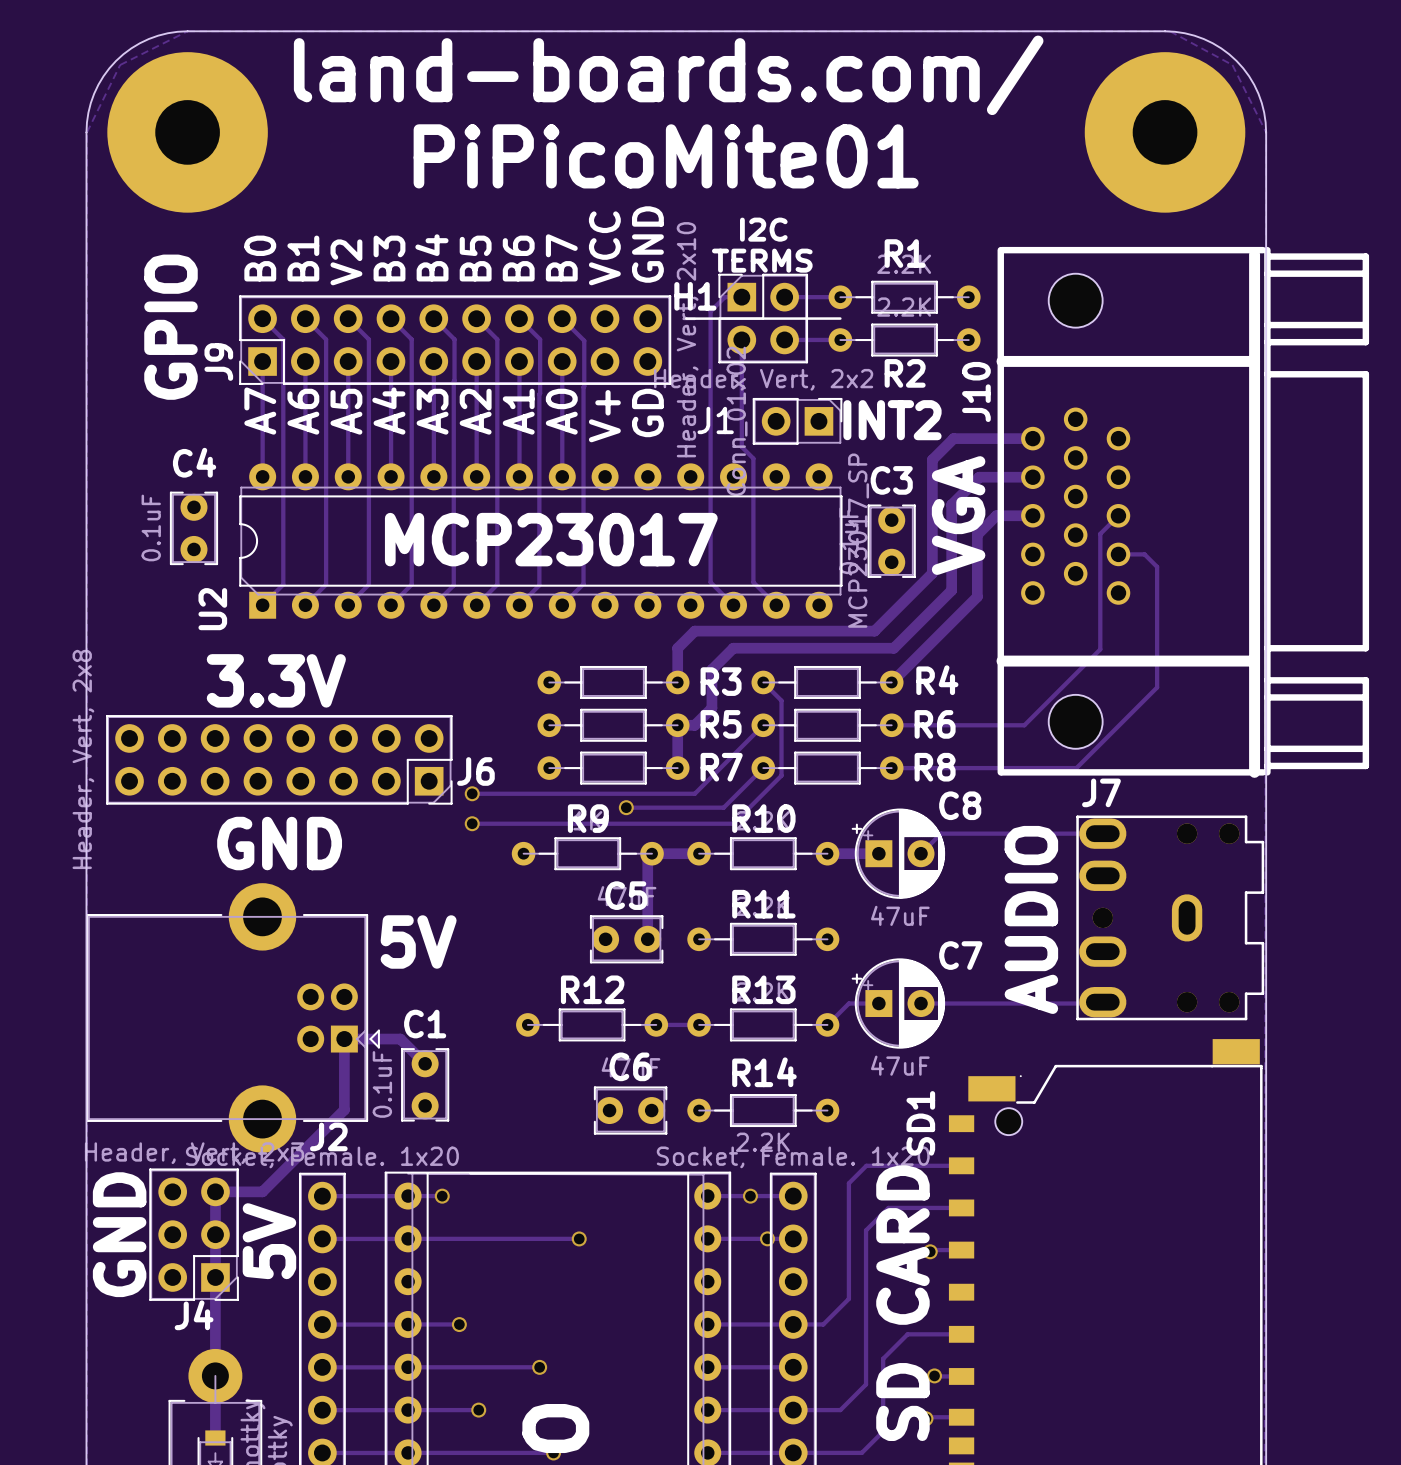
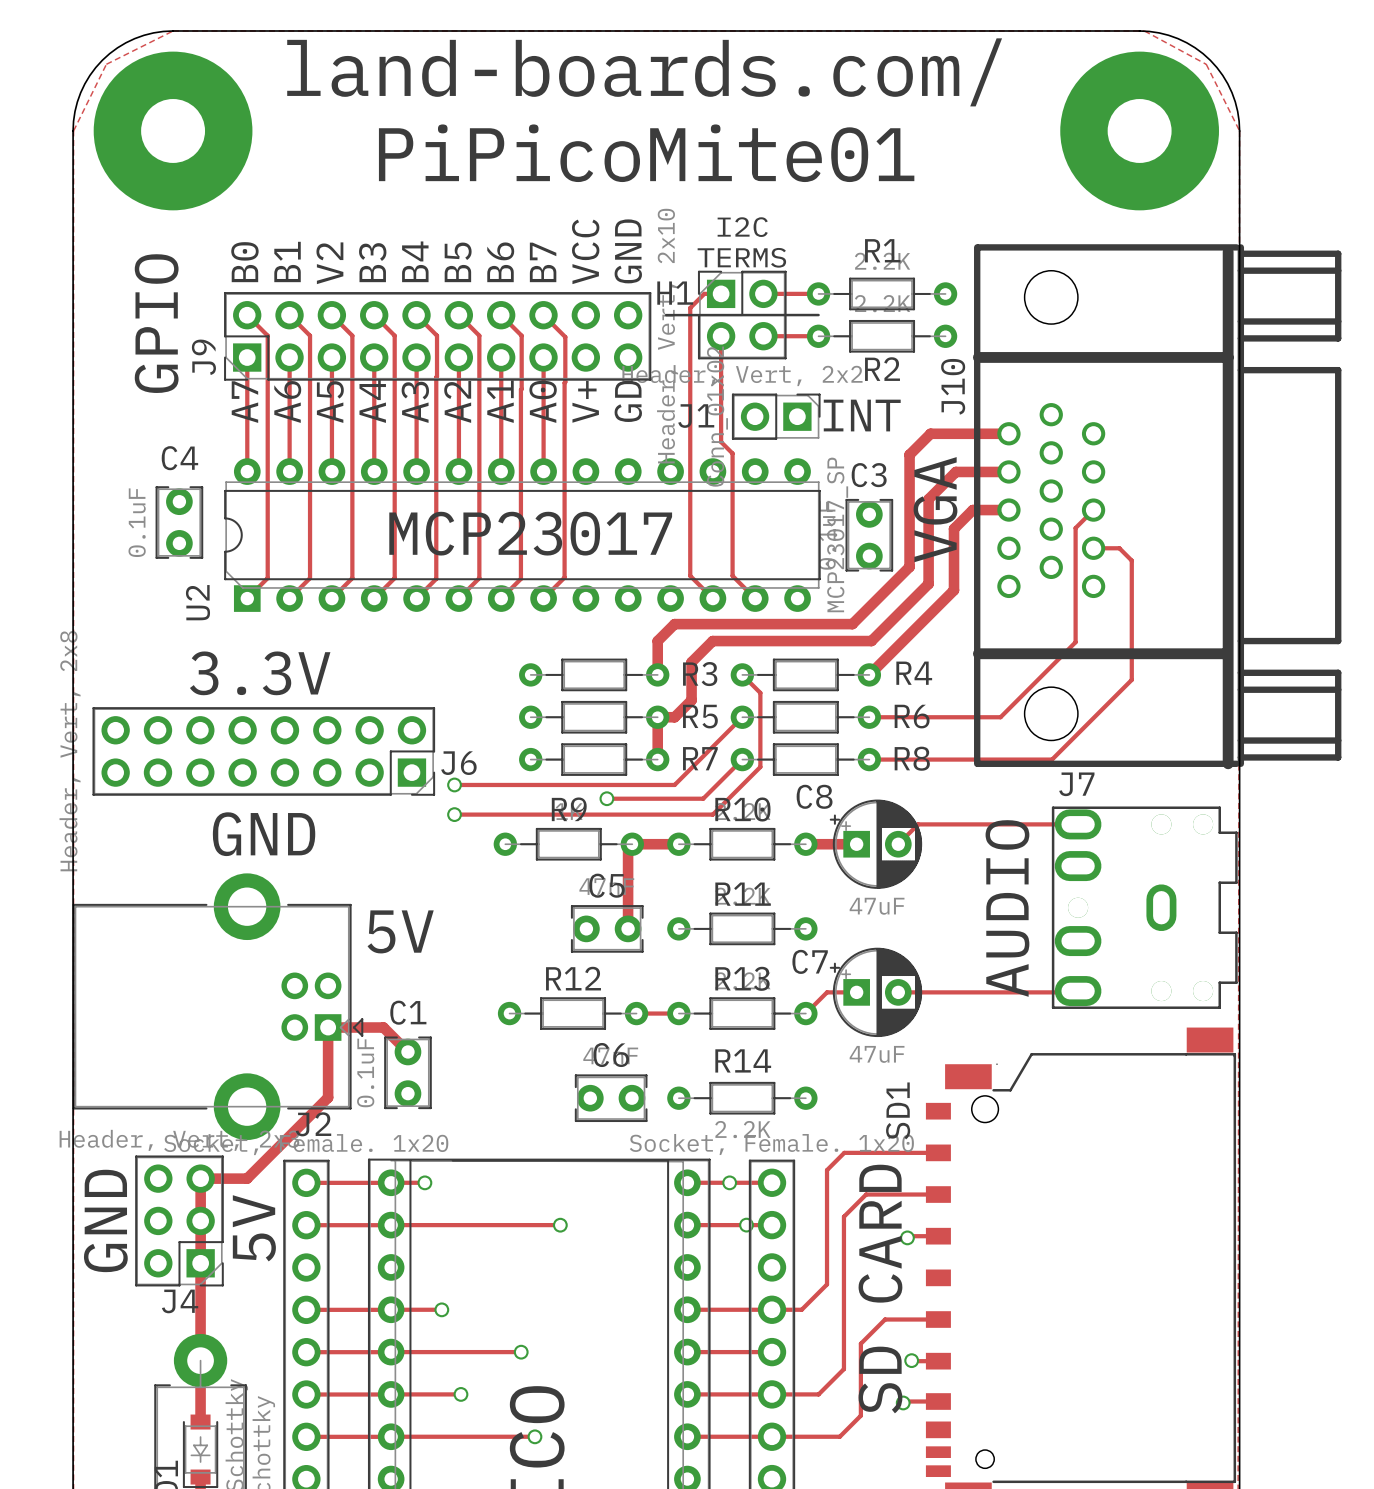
text: INT2 (892, 420) -> INT (862, 415)
C8 name position: C8 (960, 805) -> C8 (814, 796)
C7 name position: C7 (960, 955) -> C7 (810, 961)

